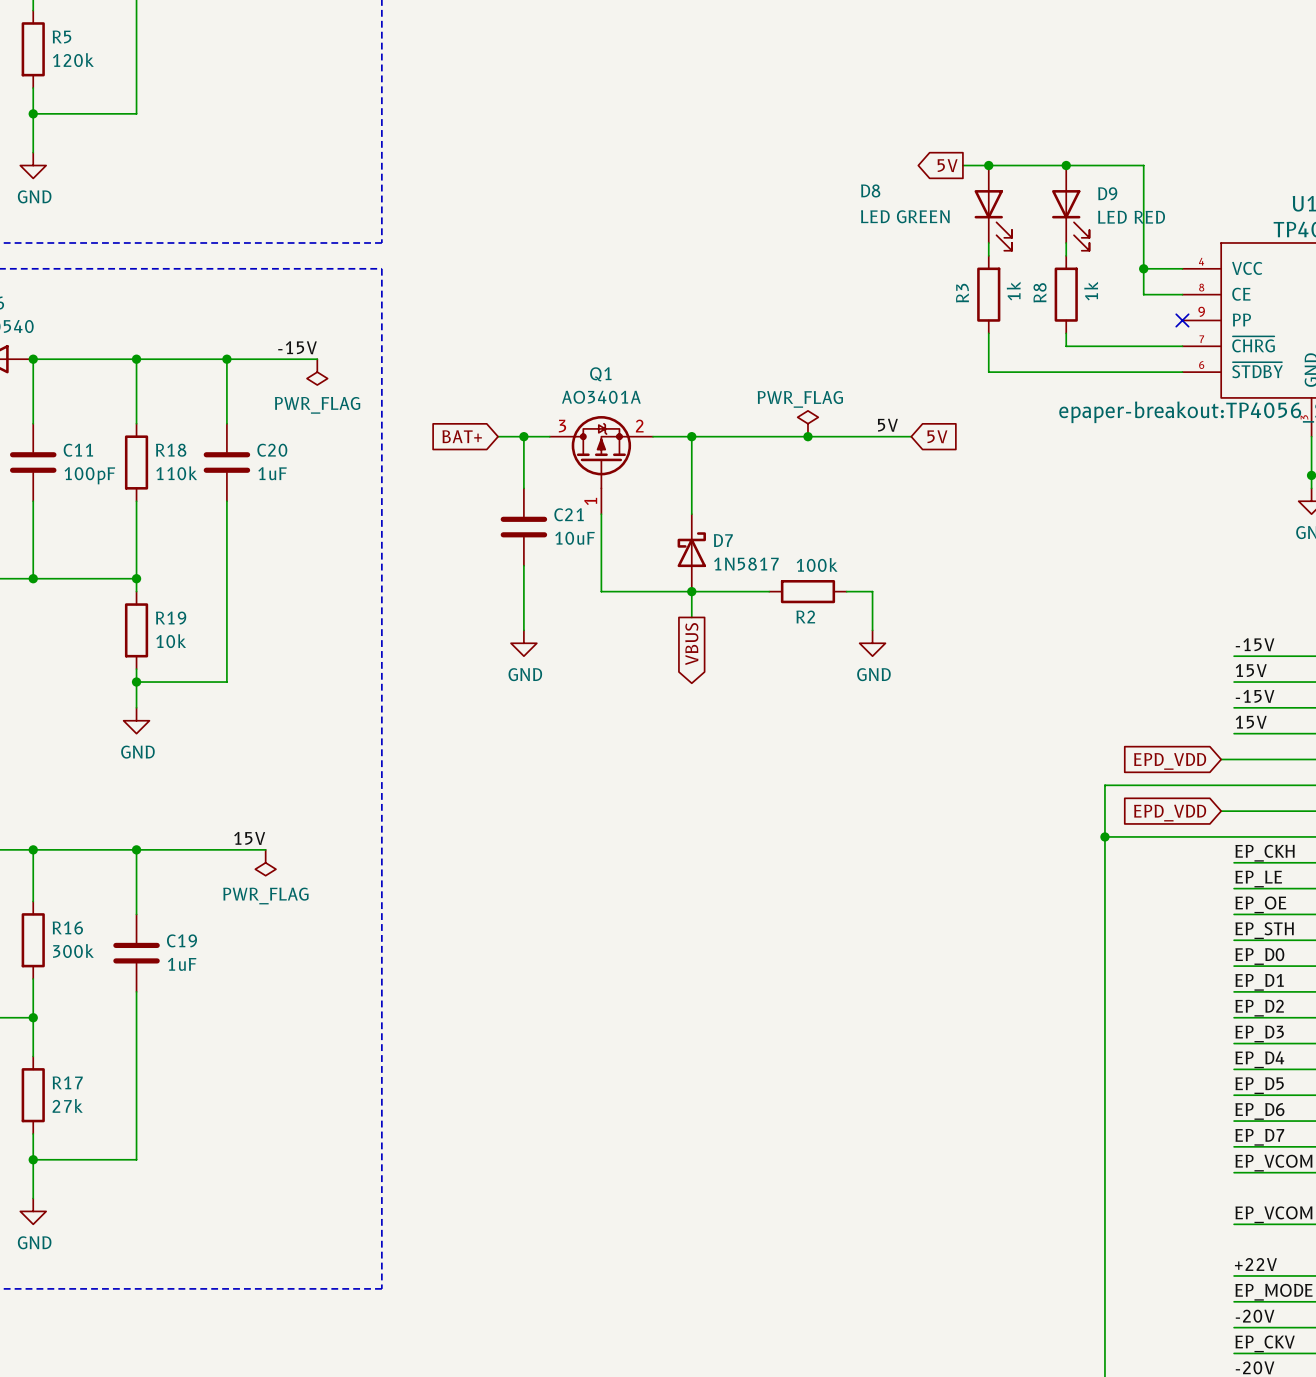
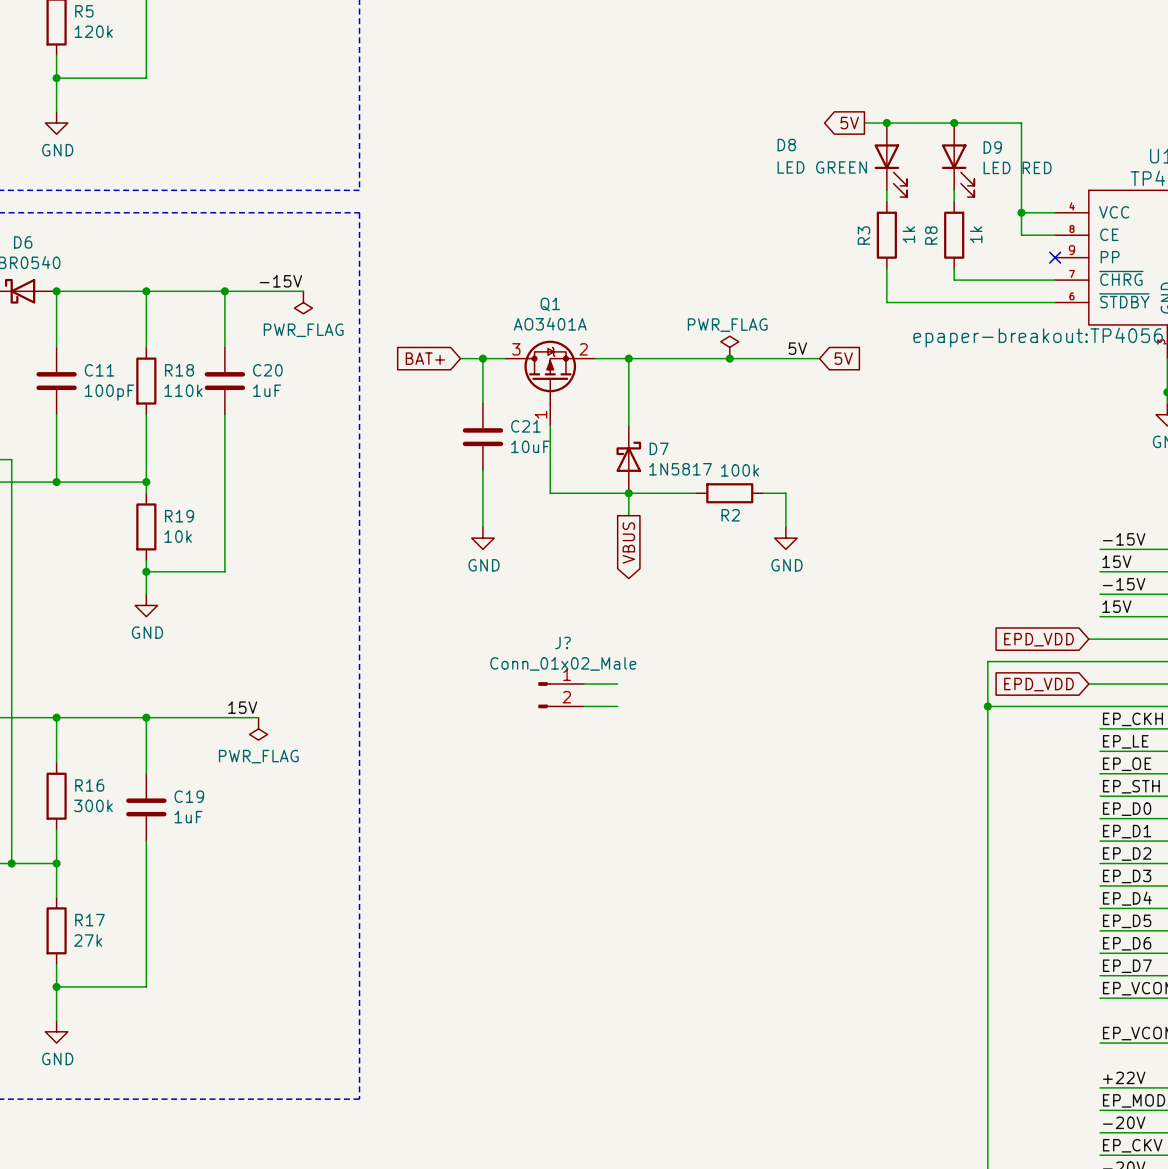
wire: none -> (583, 684) (617, 684)
J?: none -> Conn_01x02_Male (561, 695)
wire: none -> (583, 706) (617, 706)

